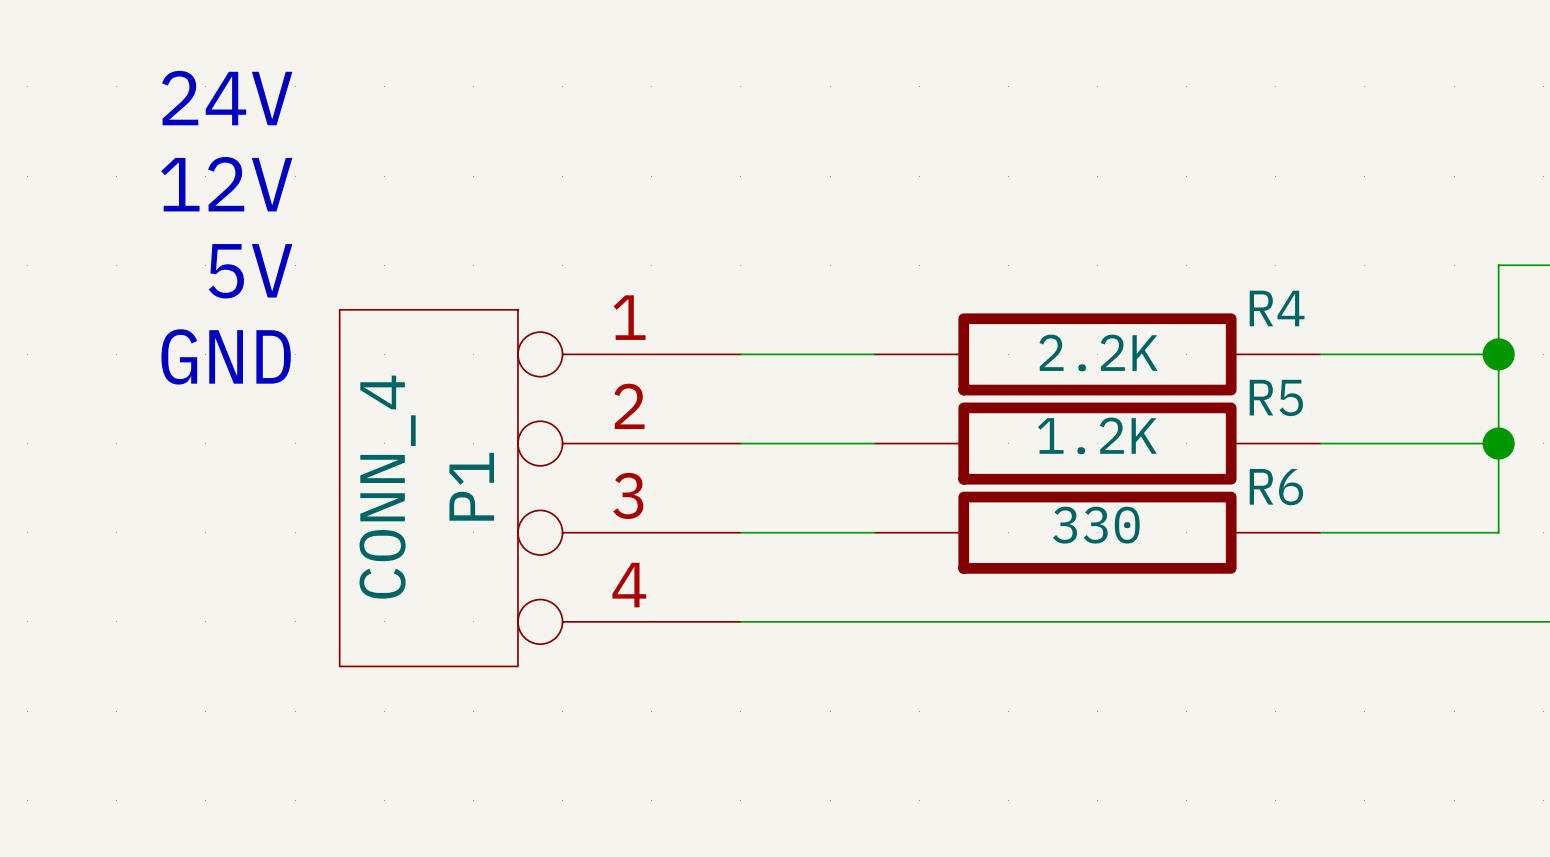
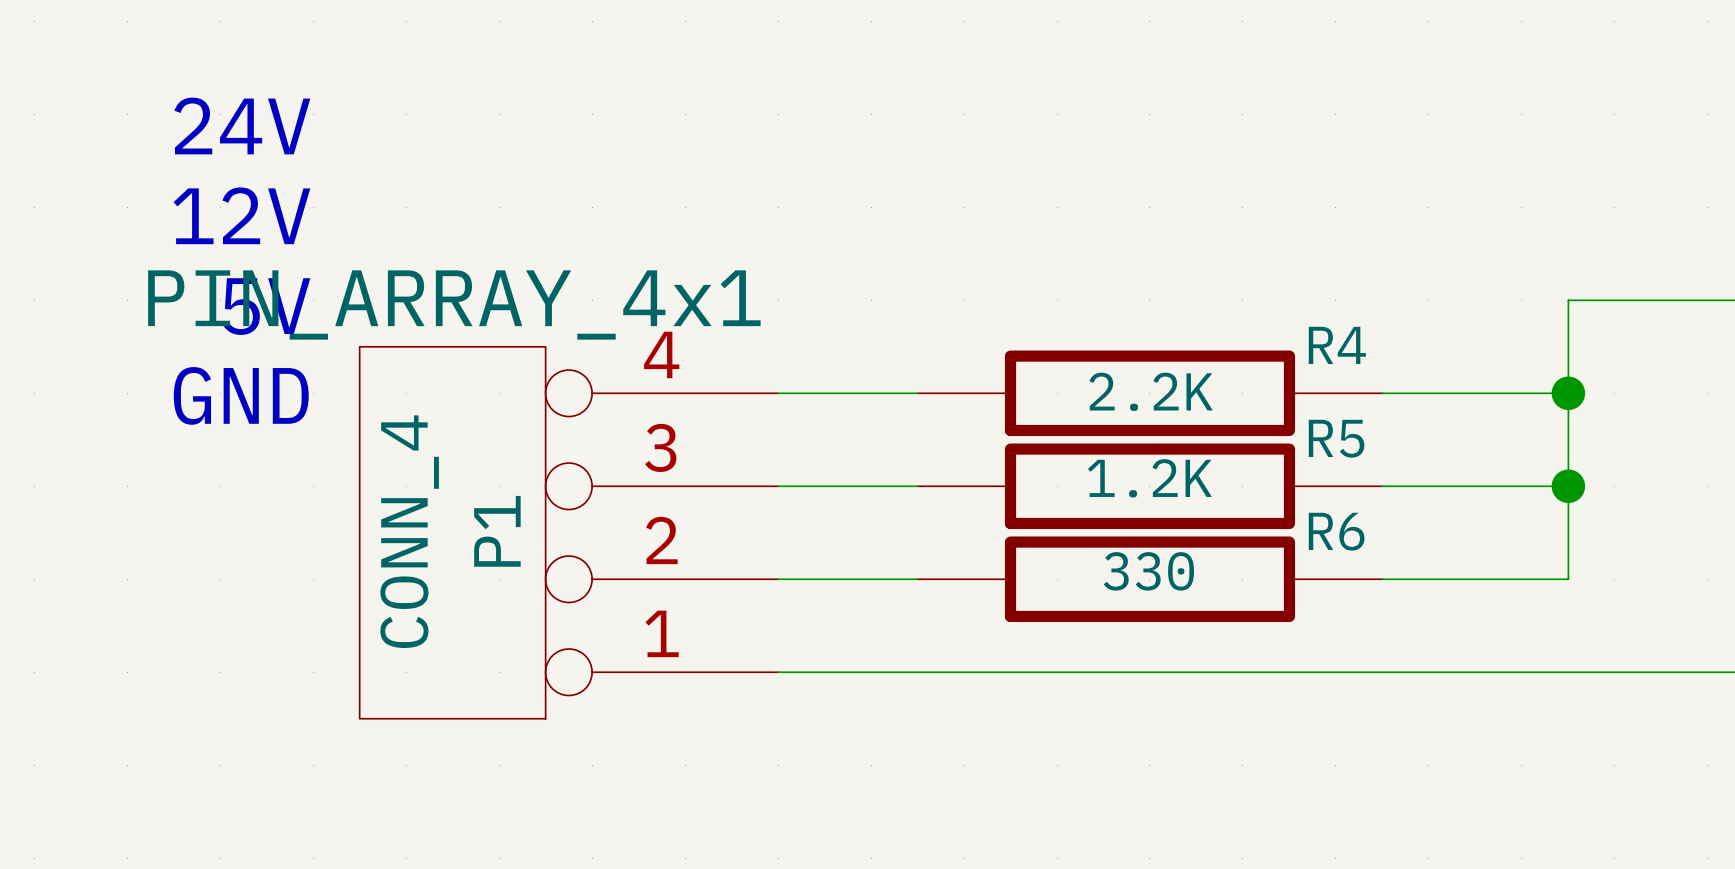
P1 text: none -> PIN_ARRAY_4x1 (454, 304)
P1 flip: as is (428, 488) -> up-down (452, 532)

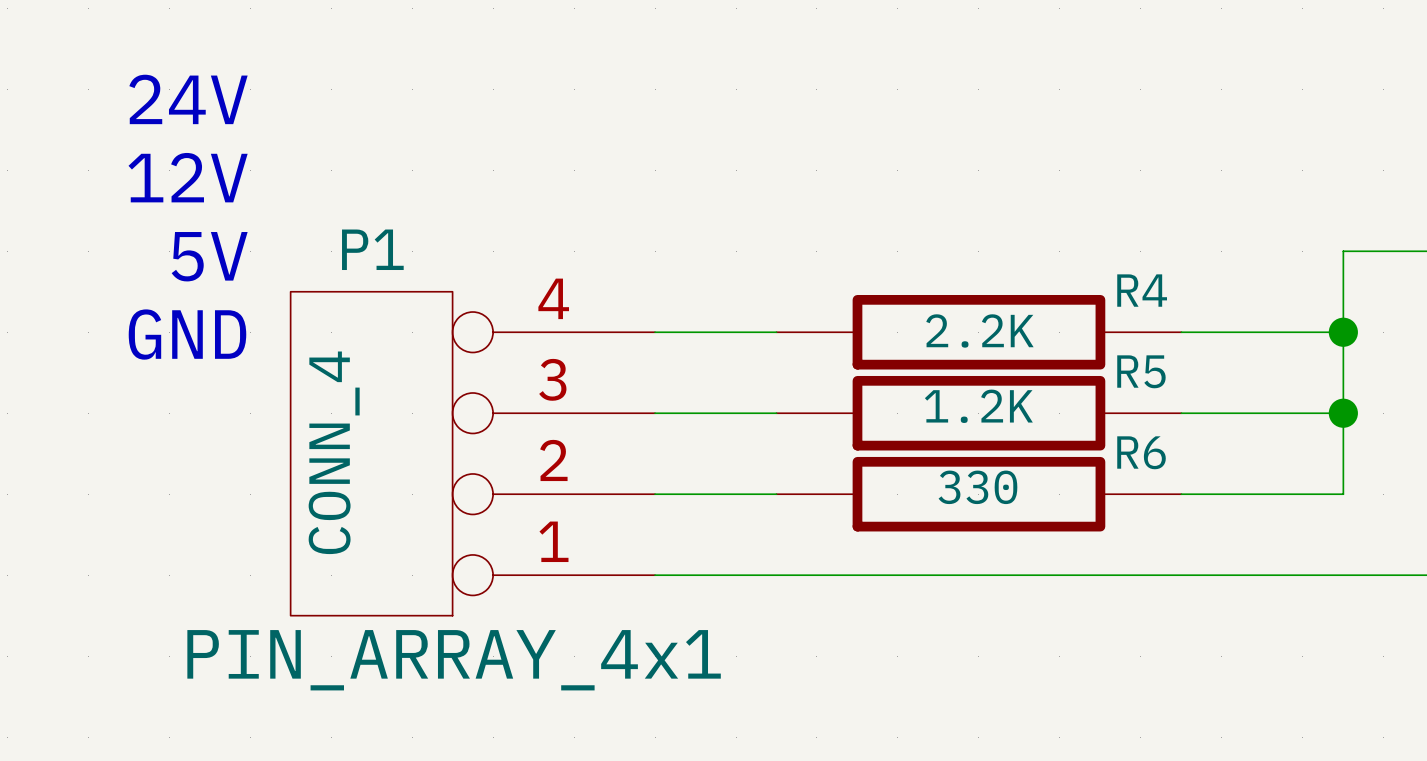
P1 text position: PIN_ARRAY_4x1 (454, 304) -> PIN_ARRAY_4x1 (454, 660)
P1 name rotation: 0° (497, 531) -> 90° clockwise (372, 249)
P1 name position: P1 (497, 531) -> P1 (372, 249)

